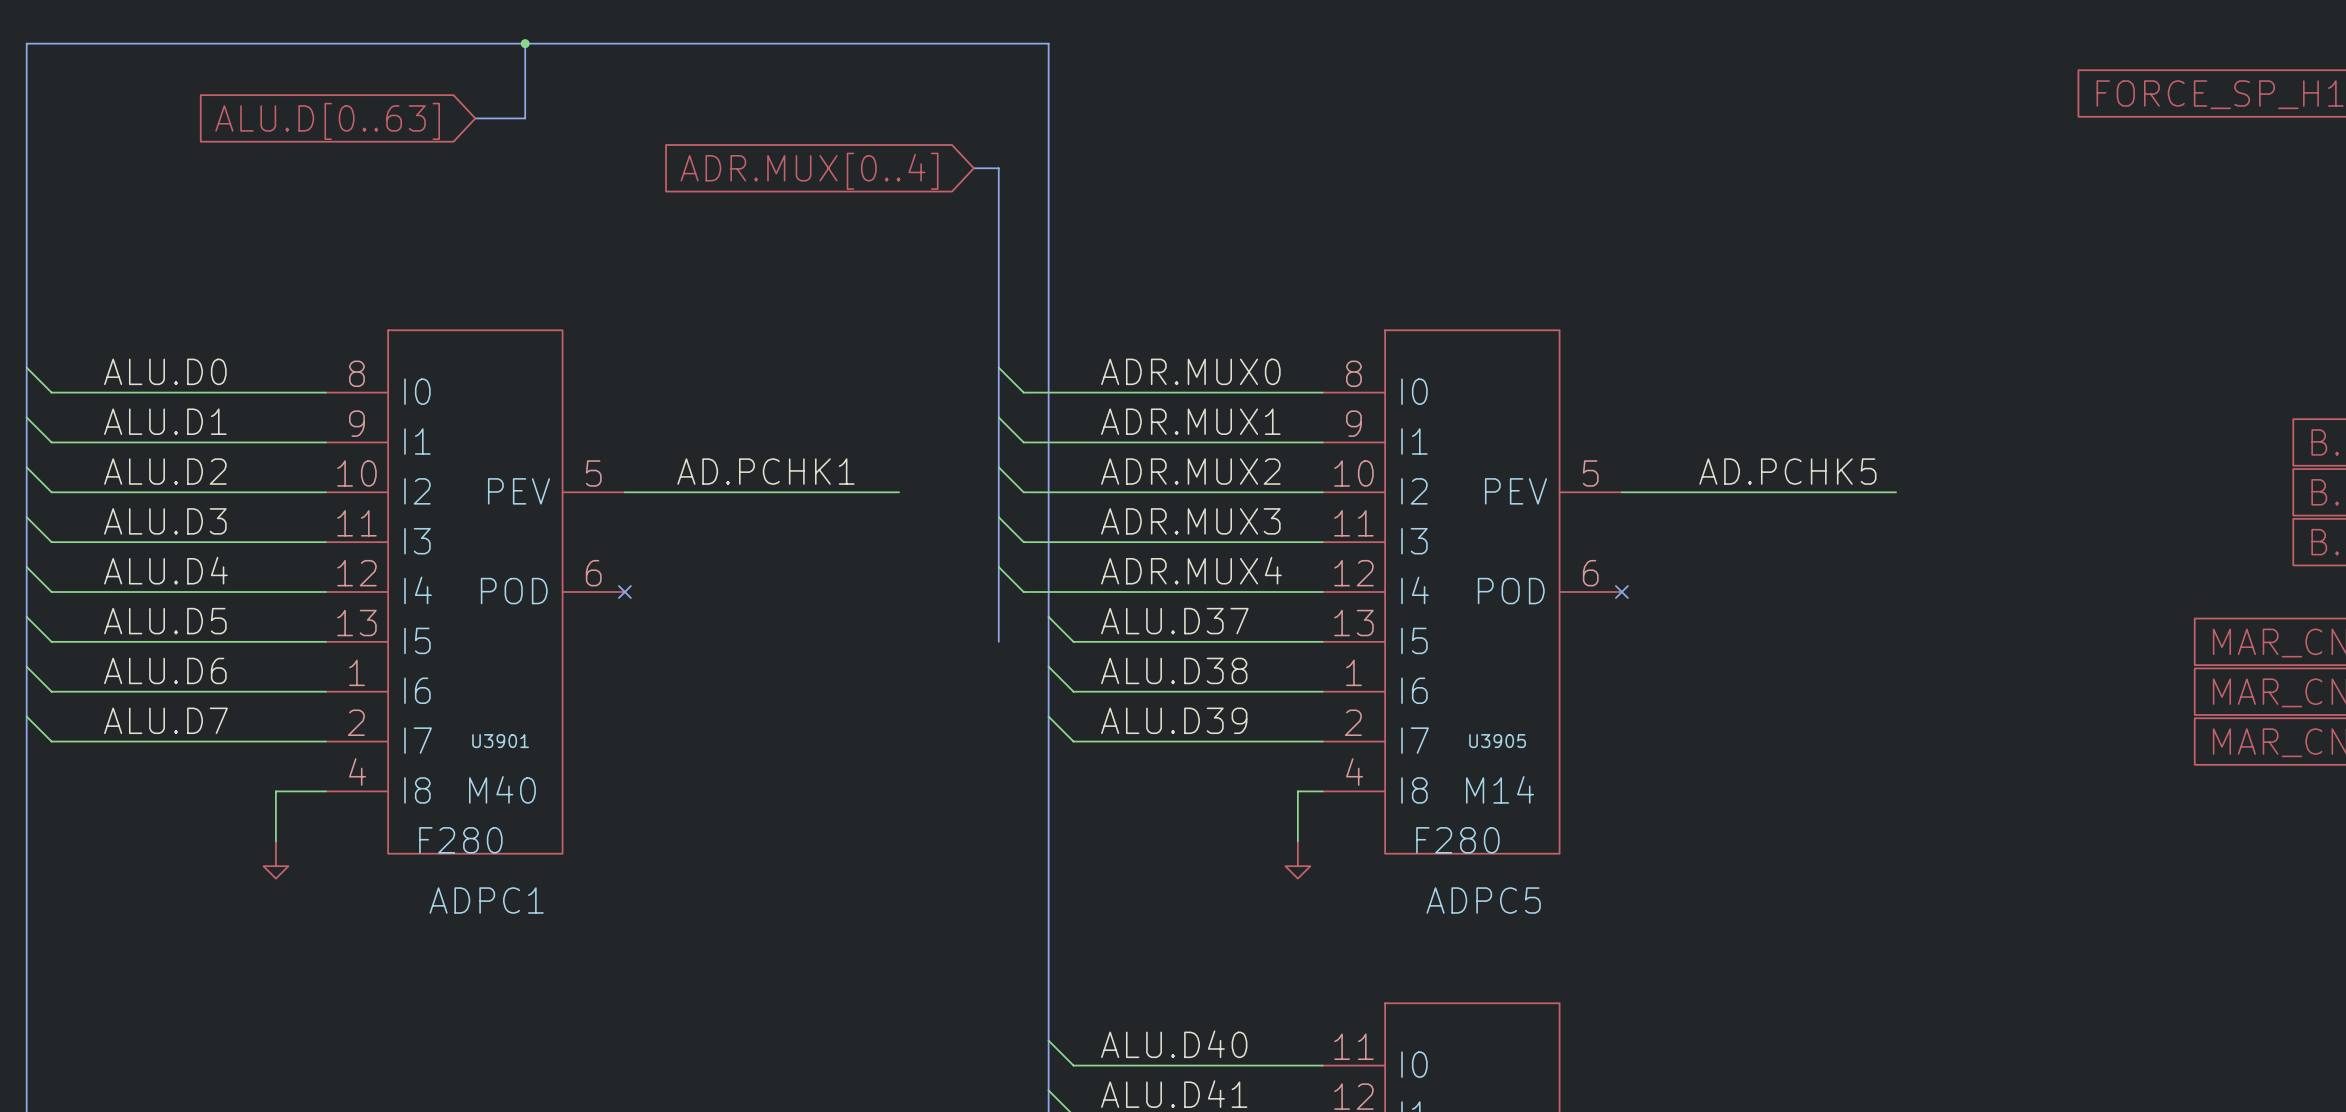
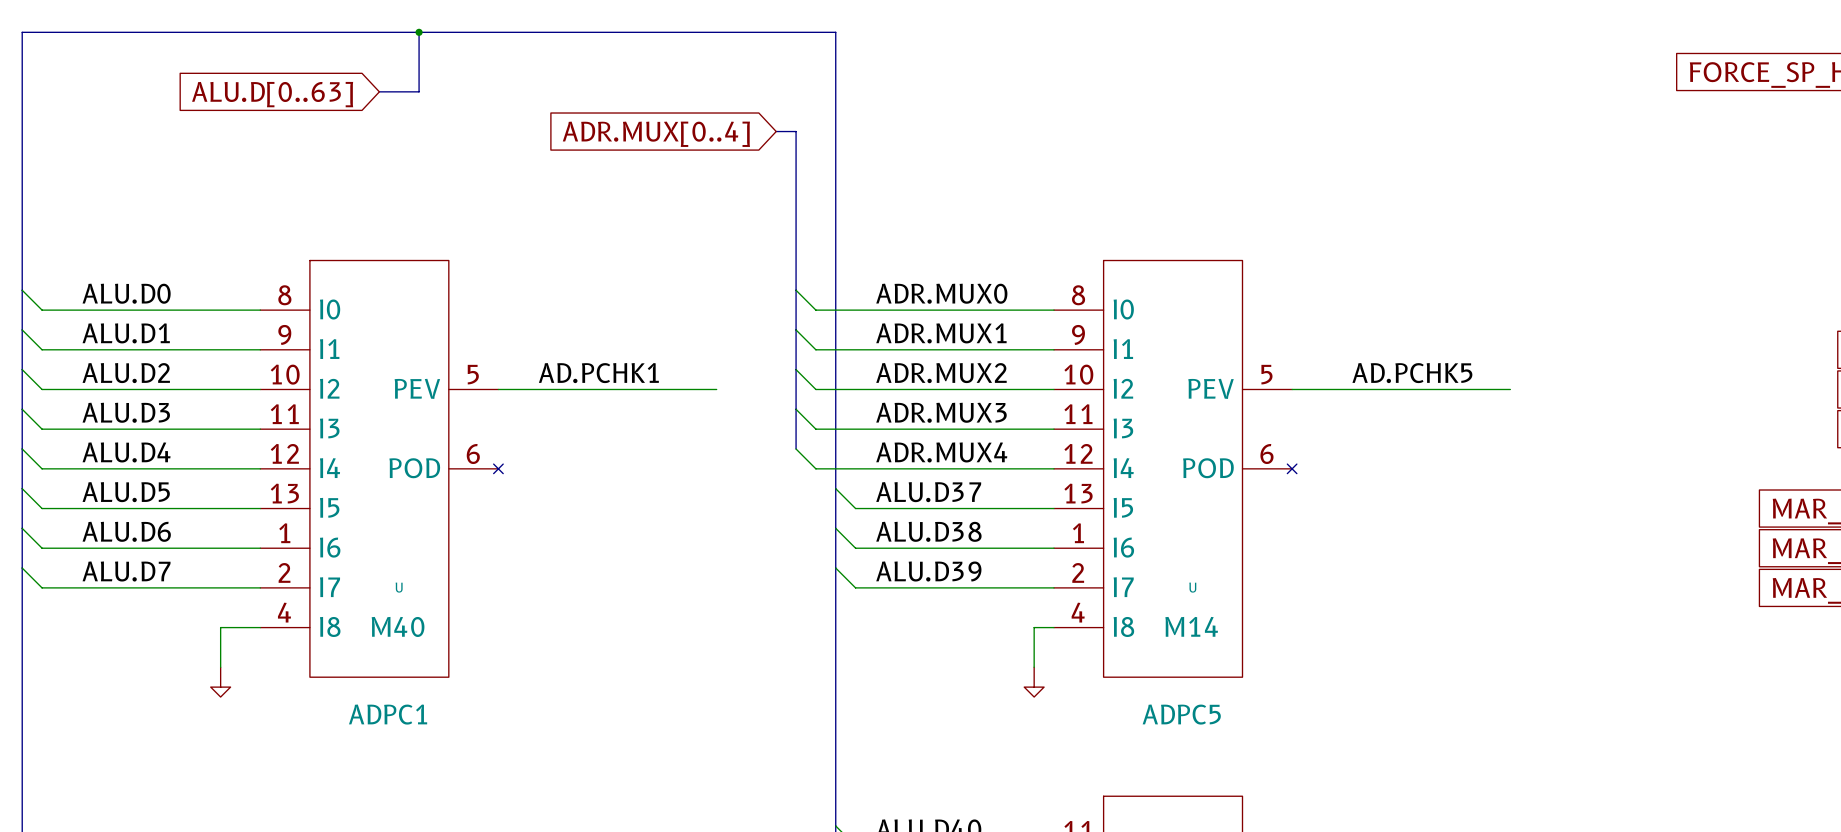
bus: (998, 567) (998, 641) -> none
U3901 name: U3901 (500, 741) -> U (399, 587)
U3905 name: U3905 (1497, 741) -> U (1192, 587)
U3901 value: F280 (460, 840) -> none
U3905 value: F280 (1457, 840) -> none

